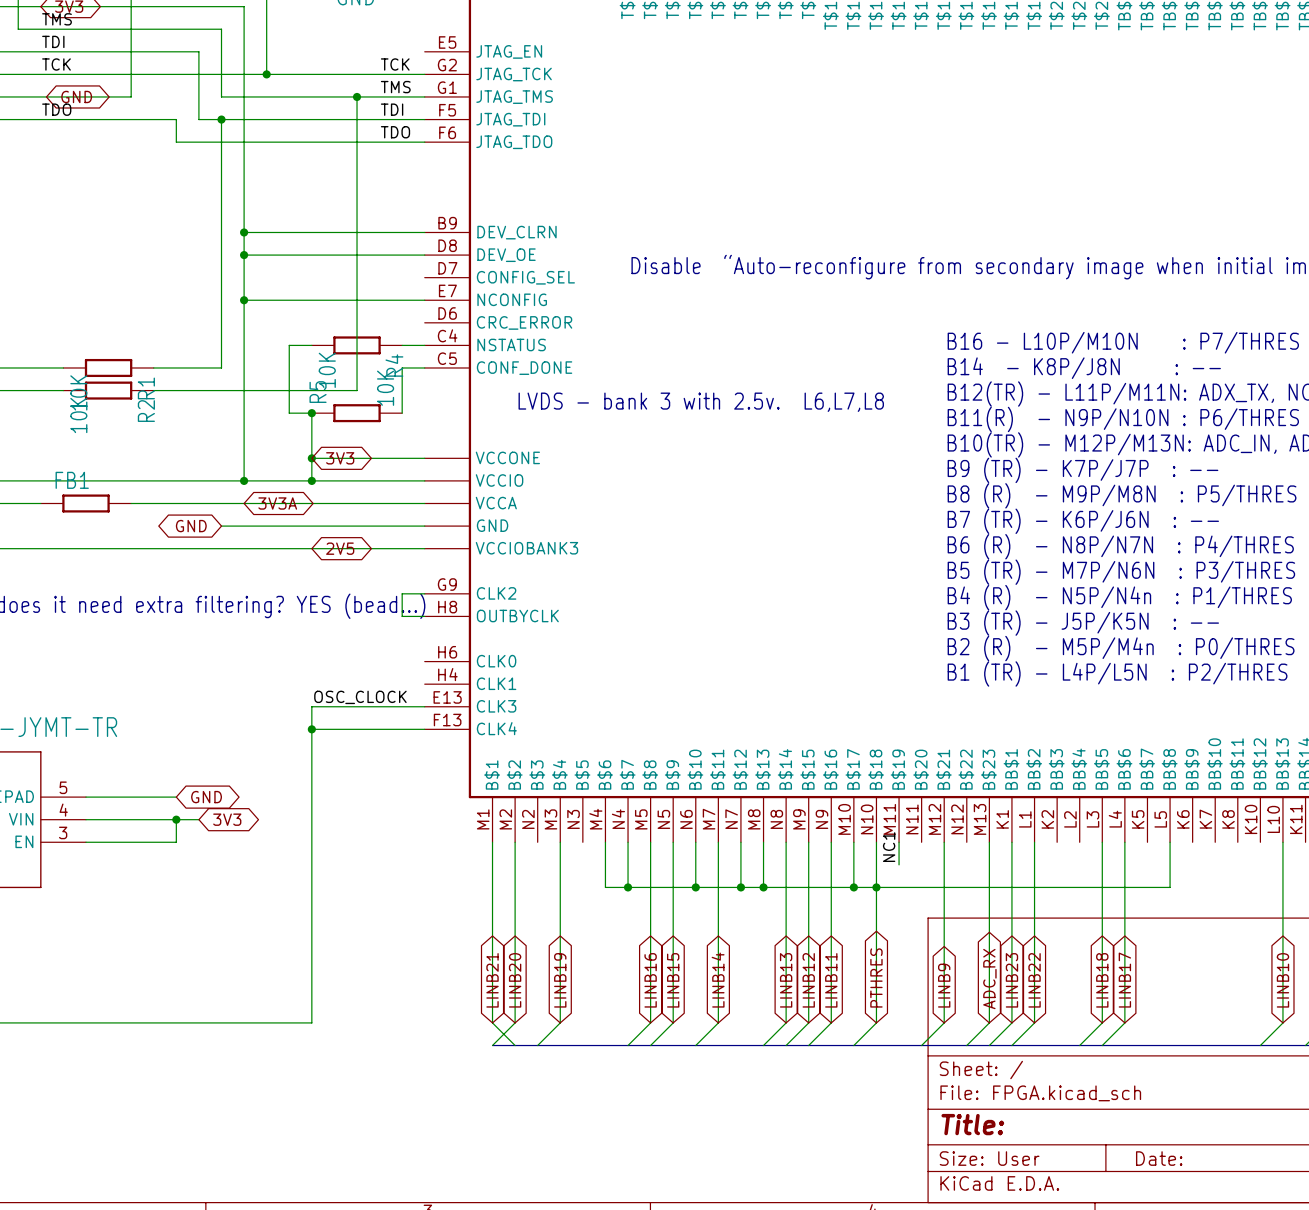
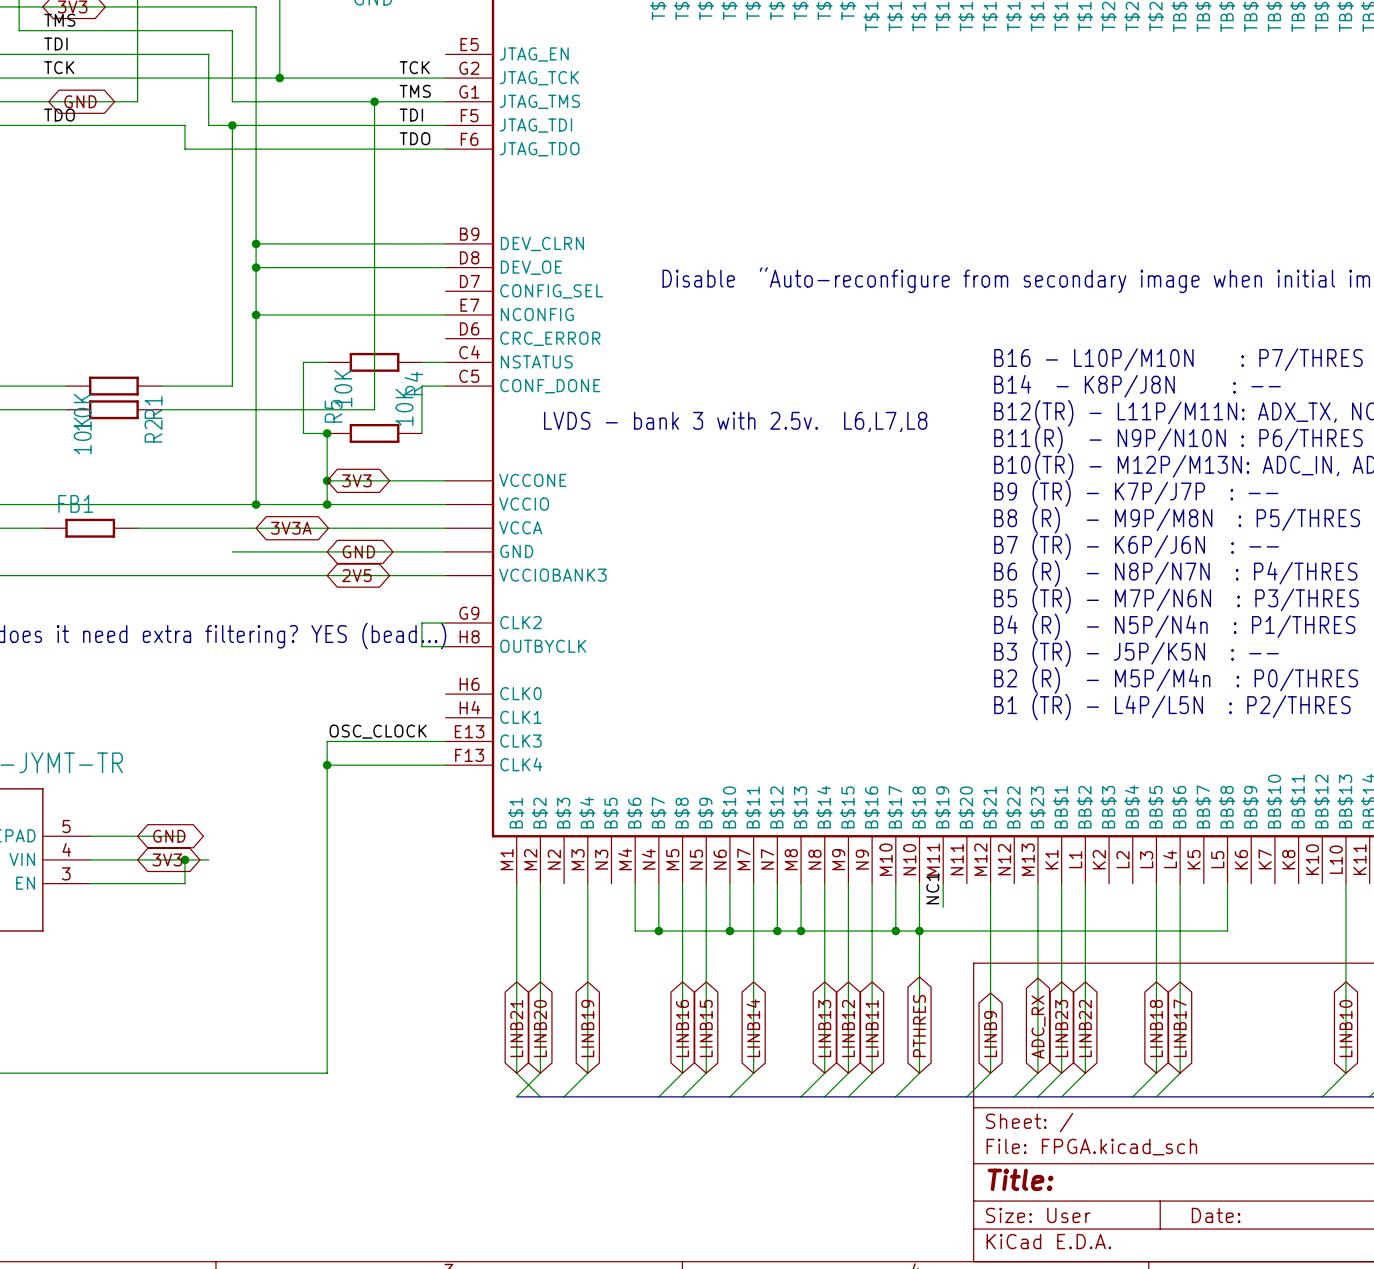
global label rotation: 0° (191, 526) -> 180° (358, 551)
global label position: GND (191, 526) -> GND (358, 551)
global label position: GND (206, 797) -> GND (169, 836)
global label position: 3V3 (227, 819) -> 3V3 (167, 859)

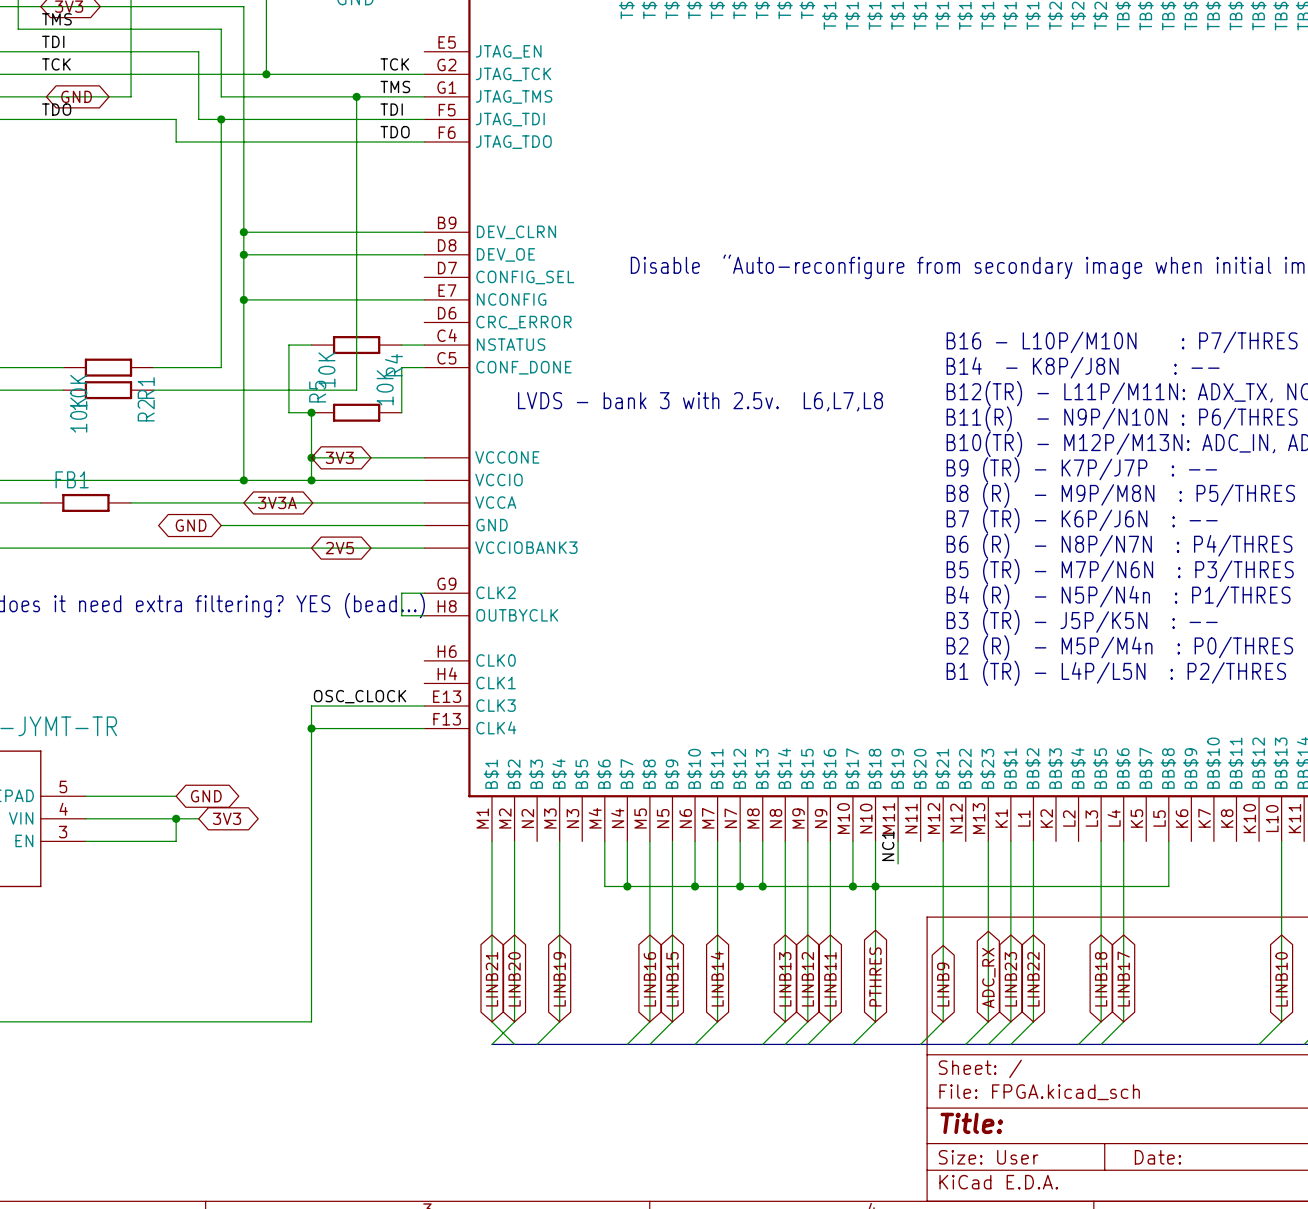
global label rotation: 0° (358, 551) -> 180° (191, 525)
global label position: GND (358, 551) -> GND (191, 525)
global label position: GND (169, 836) -> GND (206, 796)
global label position: 3V3 (167, 859) -> 3V3 (227, 818)

